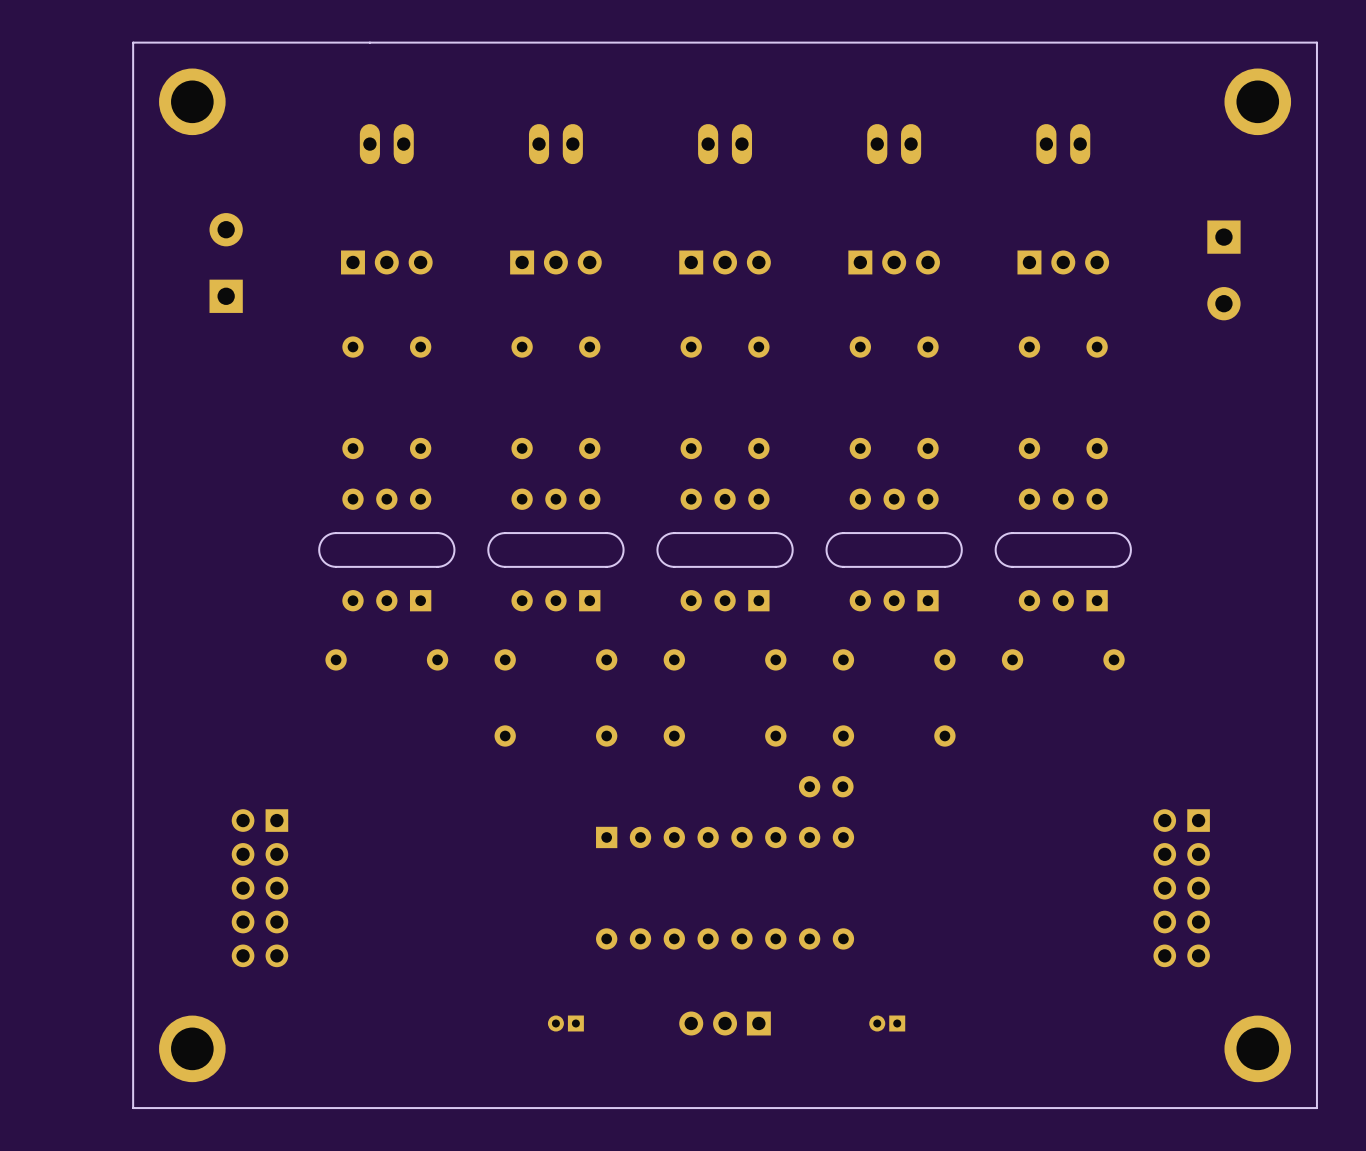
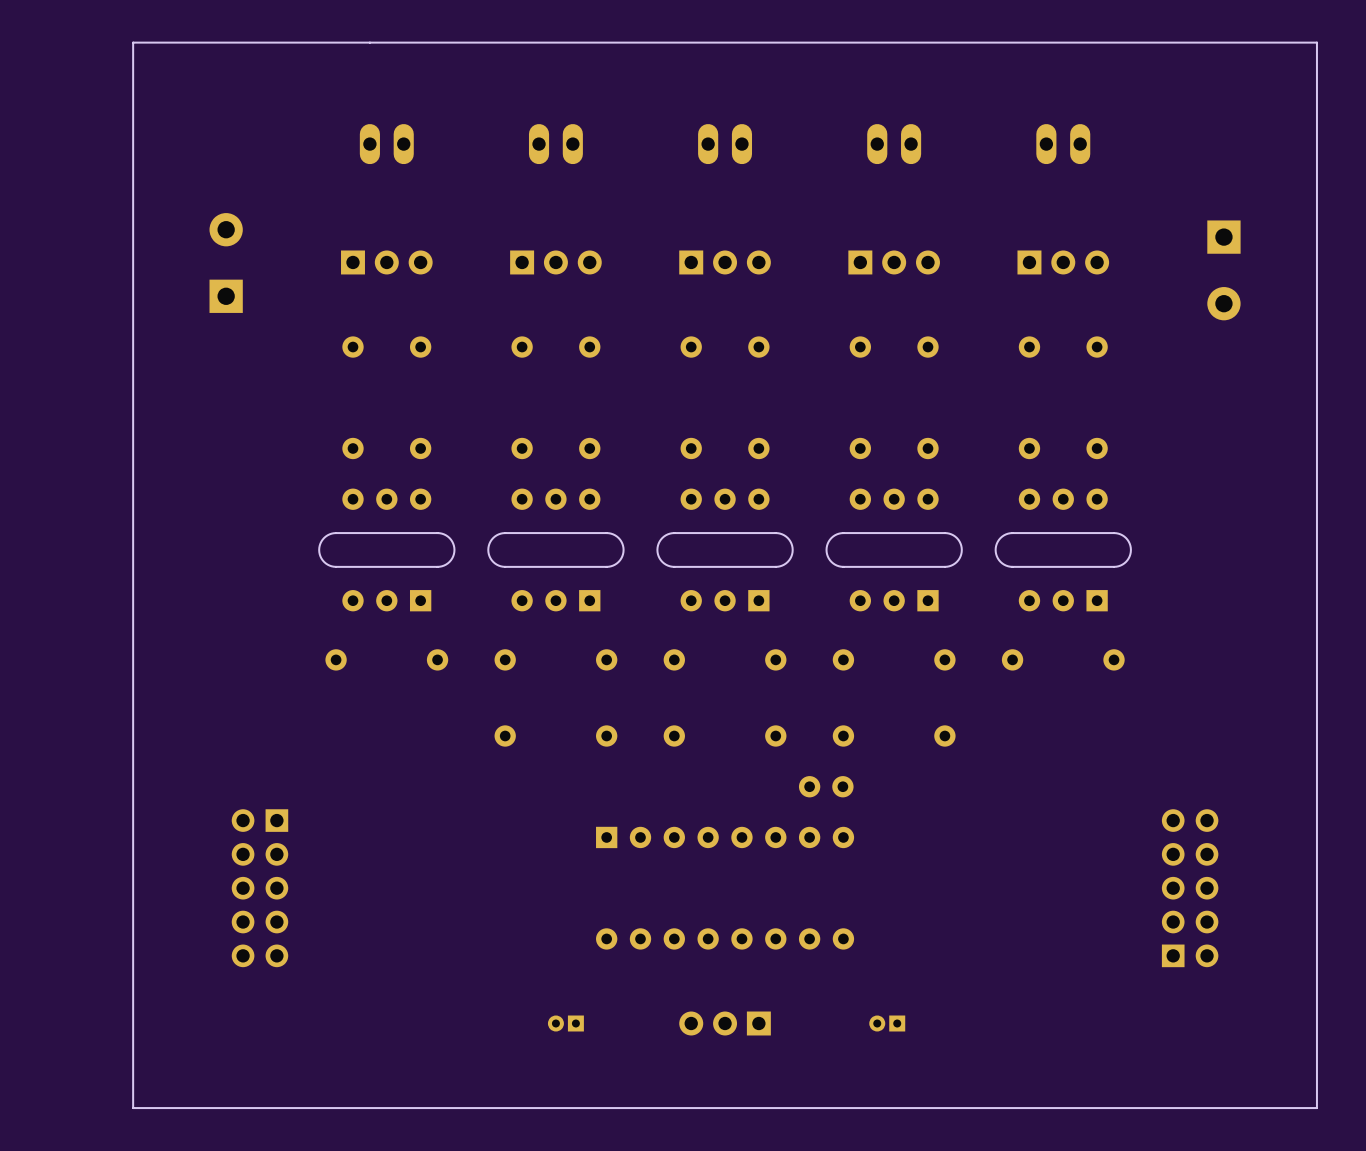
part: (192, 101) -> none
part: (1257, 101) -> none
part rotation: 0° (1181, 888) -> 180° (1190, 888)
part: (192, 1048) -> none
part: (1257, 1048) -> none

